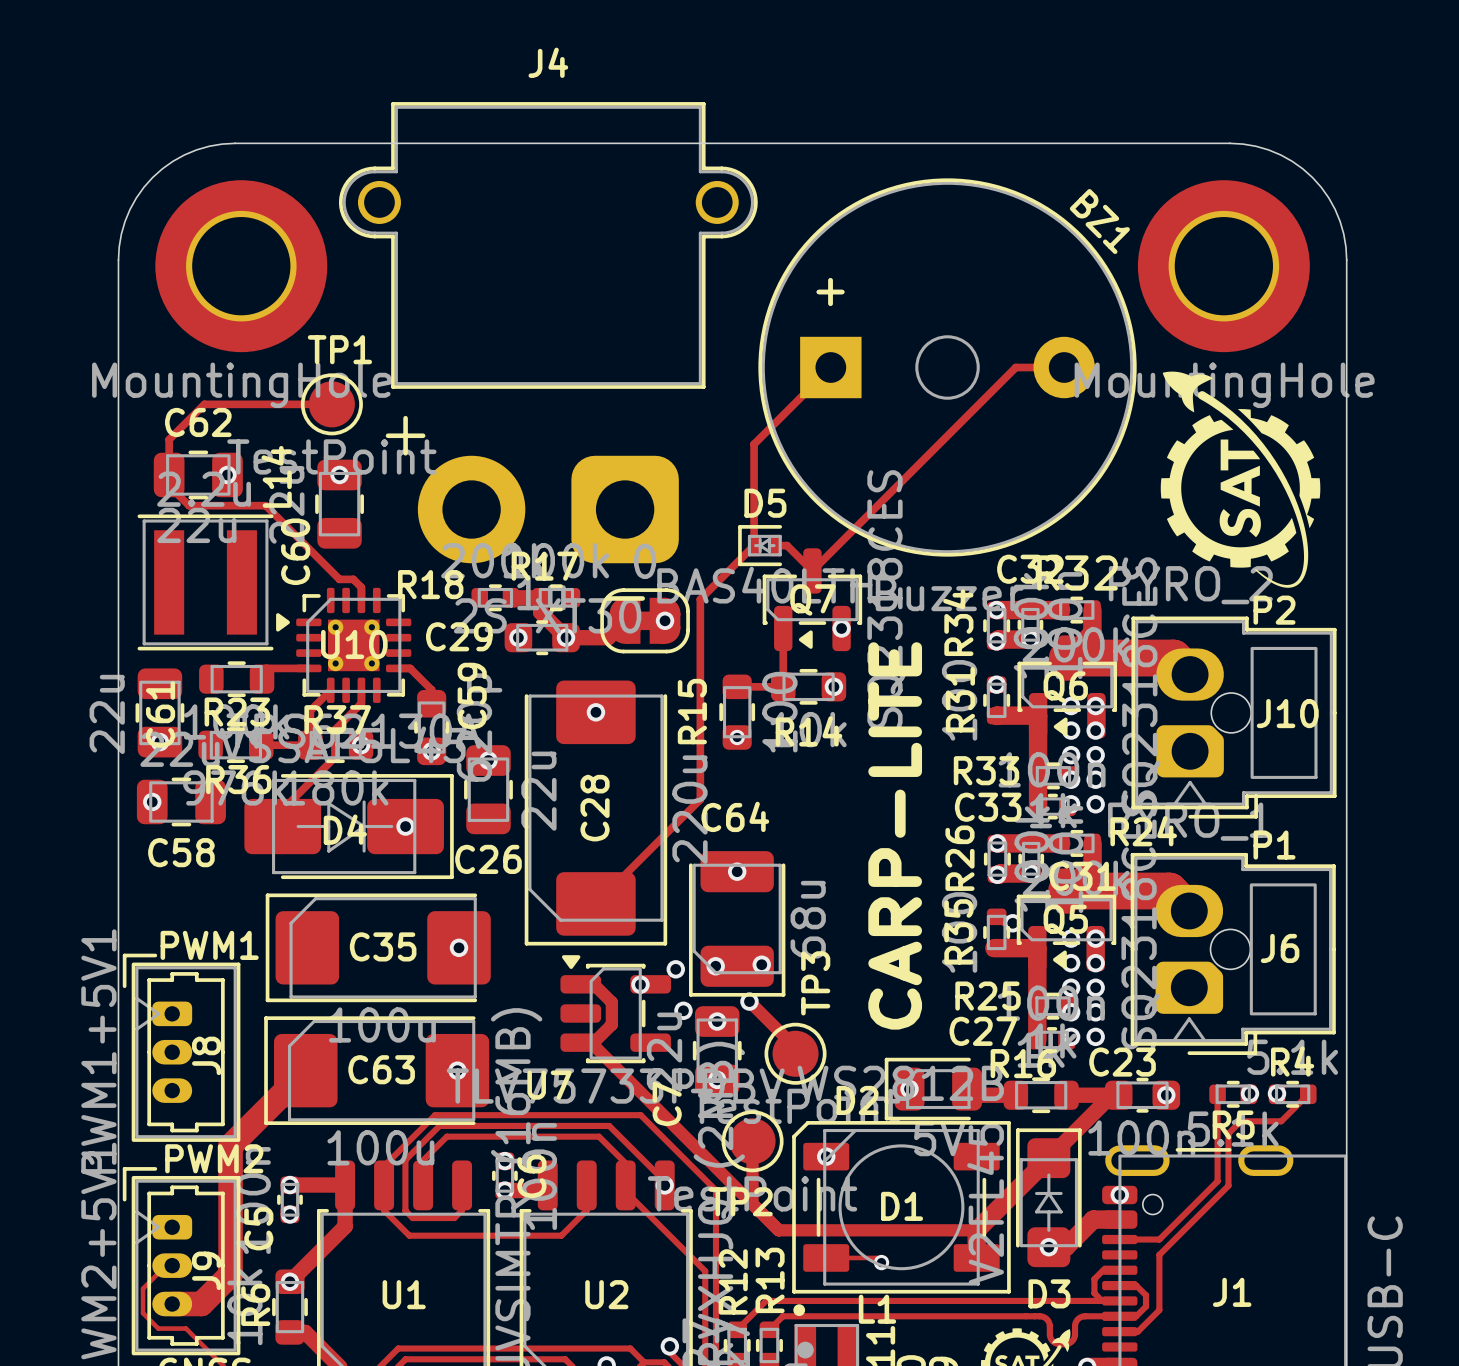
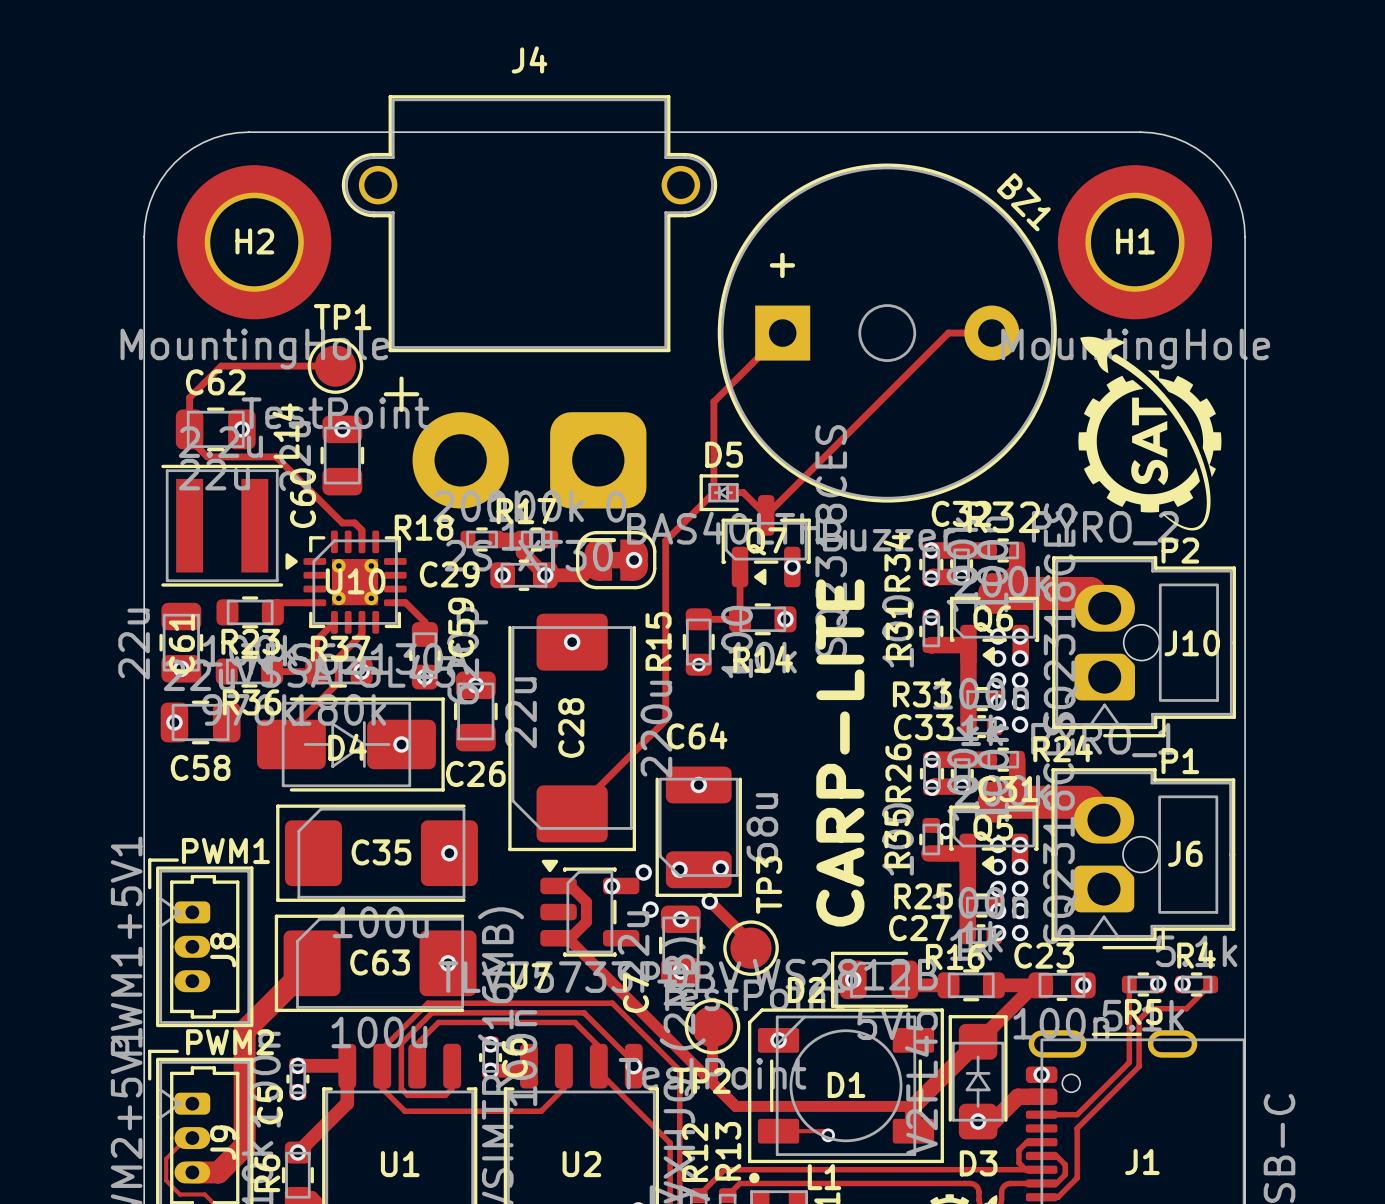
H2 name: none -> H2 (254, 241)
H1 name: none -> H1 (1135, 241)

